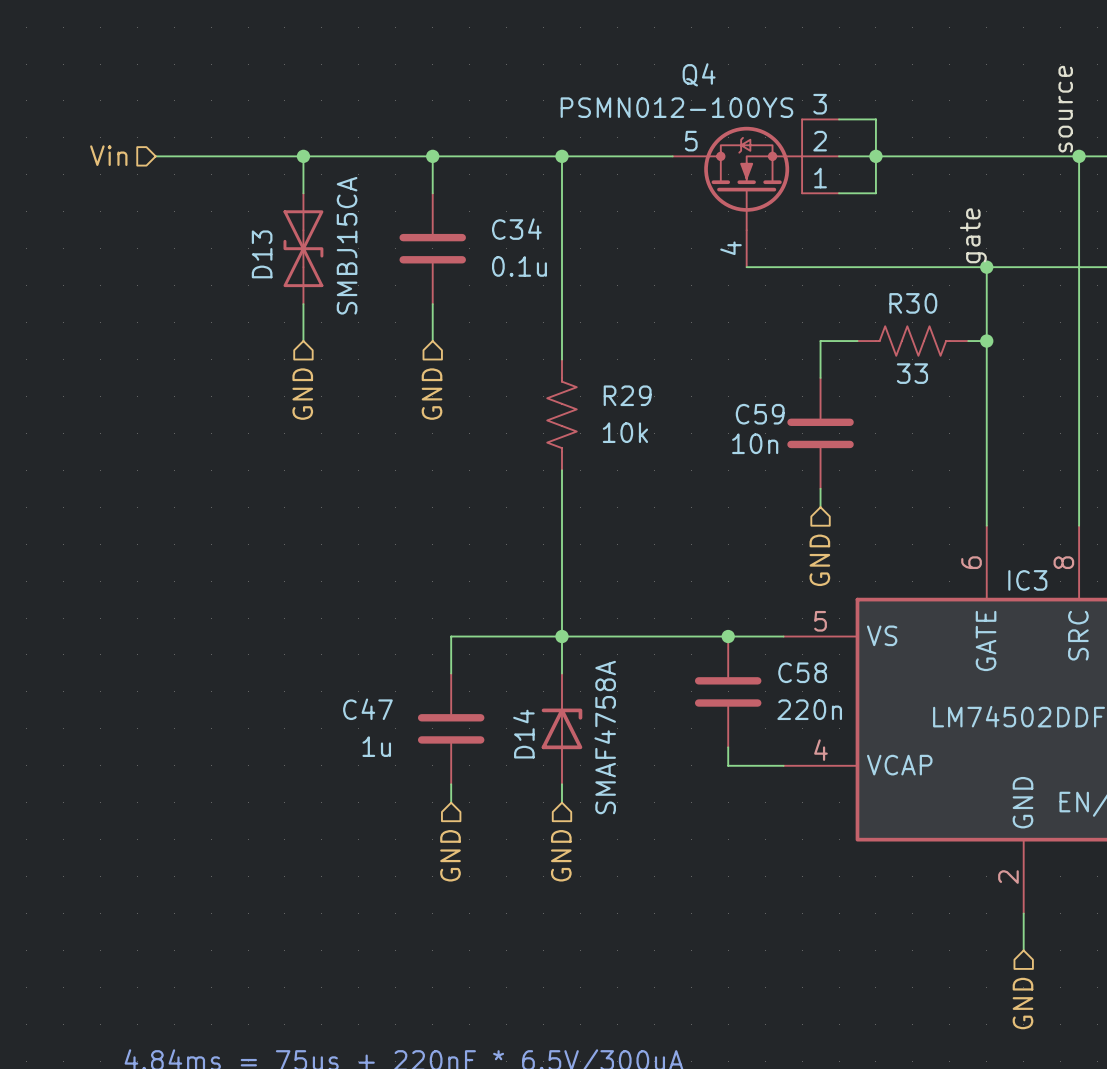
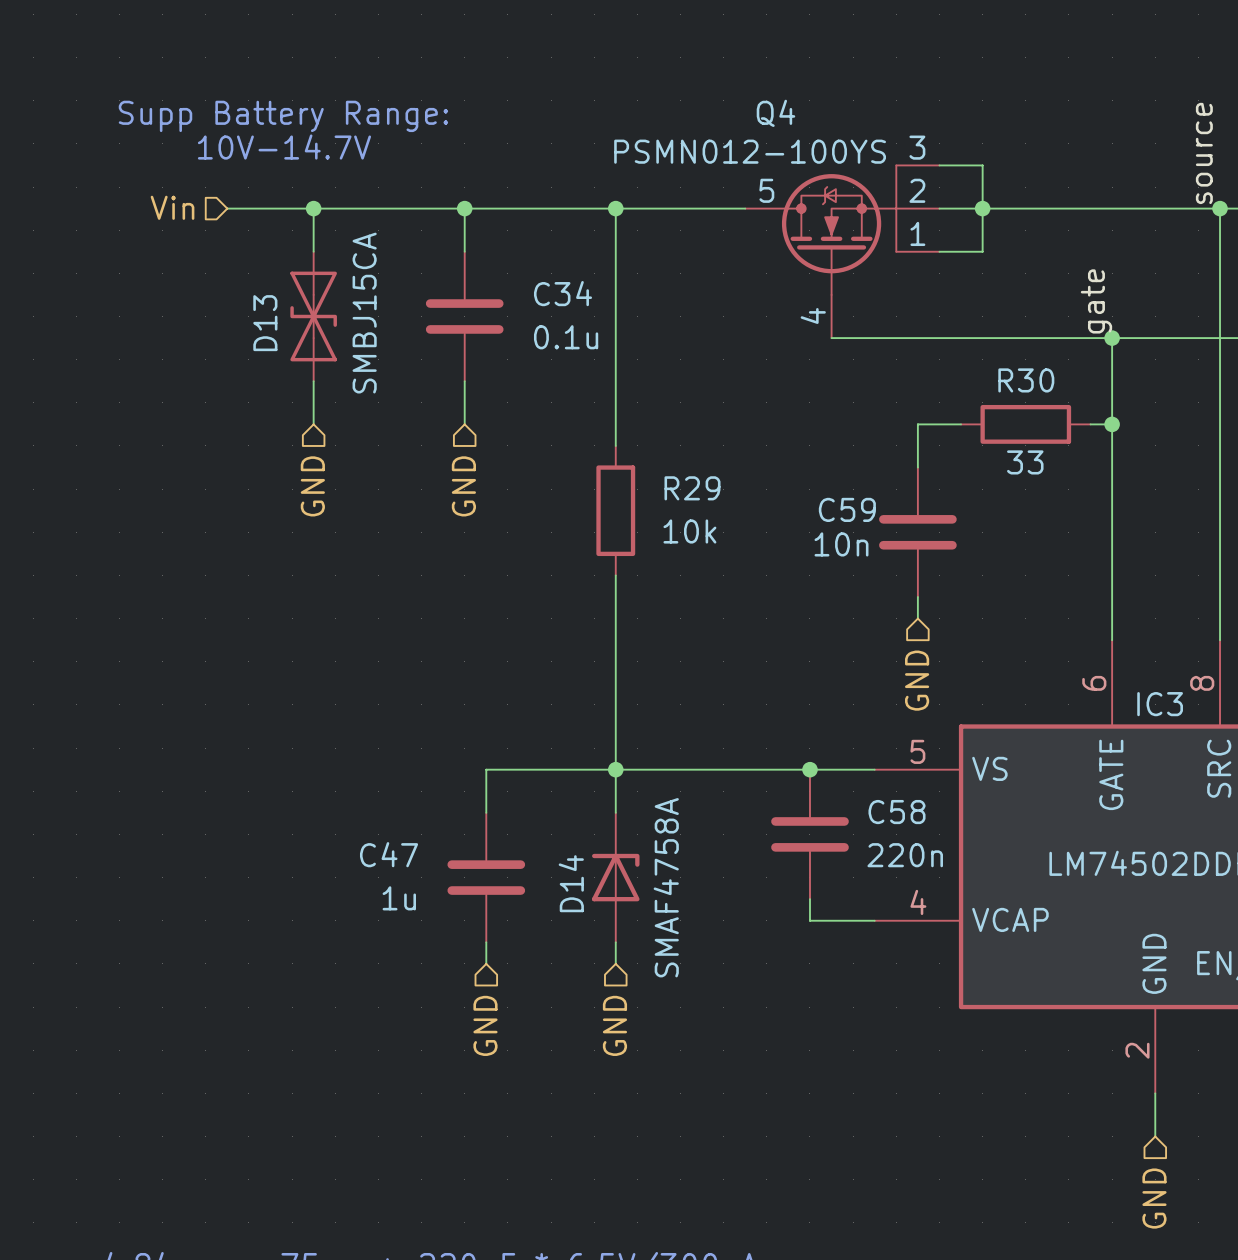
text: none -> Supp Battery Range: (283, 116)
text: none -> 10V-14.7V (284, 147)
hierarchical label position: Vin (108, 155) -> Vin (172, 207)
wire: (155, 156) (229, 156) -> none
R30 symbol: [857, 326, 969, 356] -> [961, 404, 1091, 444]
R29 symbol: [547, 359, 577, 471] -> [596, 445, 636, 576]

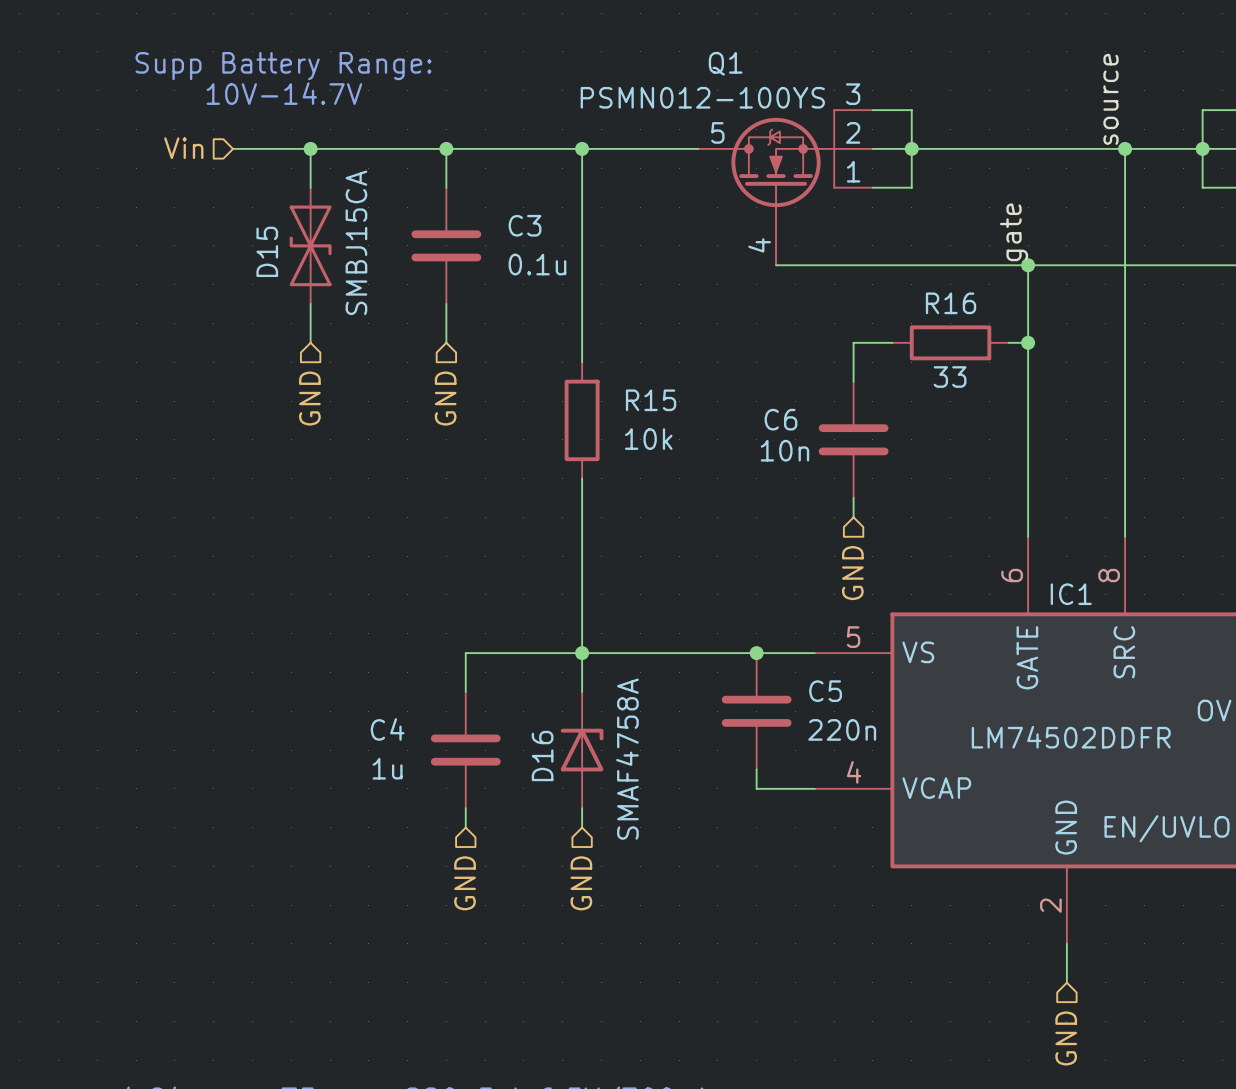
Q4 name: Q4 (775, 113) -> Q1 (725, 63)
C34 name: C34 (563, 293) -> C3 (525, 225)
D13 name: D13 (265, 323) -> D15 (267, 251)
R30 name: R30 (1026, 380) -> R16 (951, 303)
R29 name: R29 (692, 488) -> R15 (651, 400)
C59 name: C59 (847, 509) -> C6 (780, 419)
IC3 name: IC3 (1160, 704) -> IC1 (1071, 594)
C58 name: C58 (896, 812) -> C5 (825, 691)
C47 name: C47 (389, 854) -> C4 (387, 729)
D14 name: D14 (571, 883) -> D16 (542, 756)

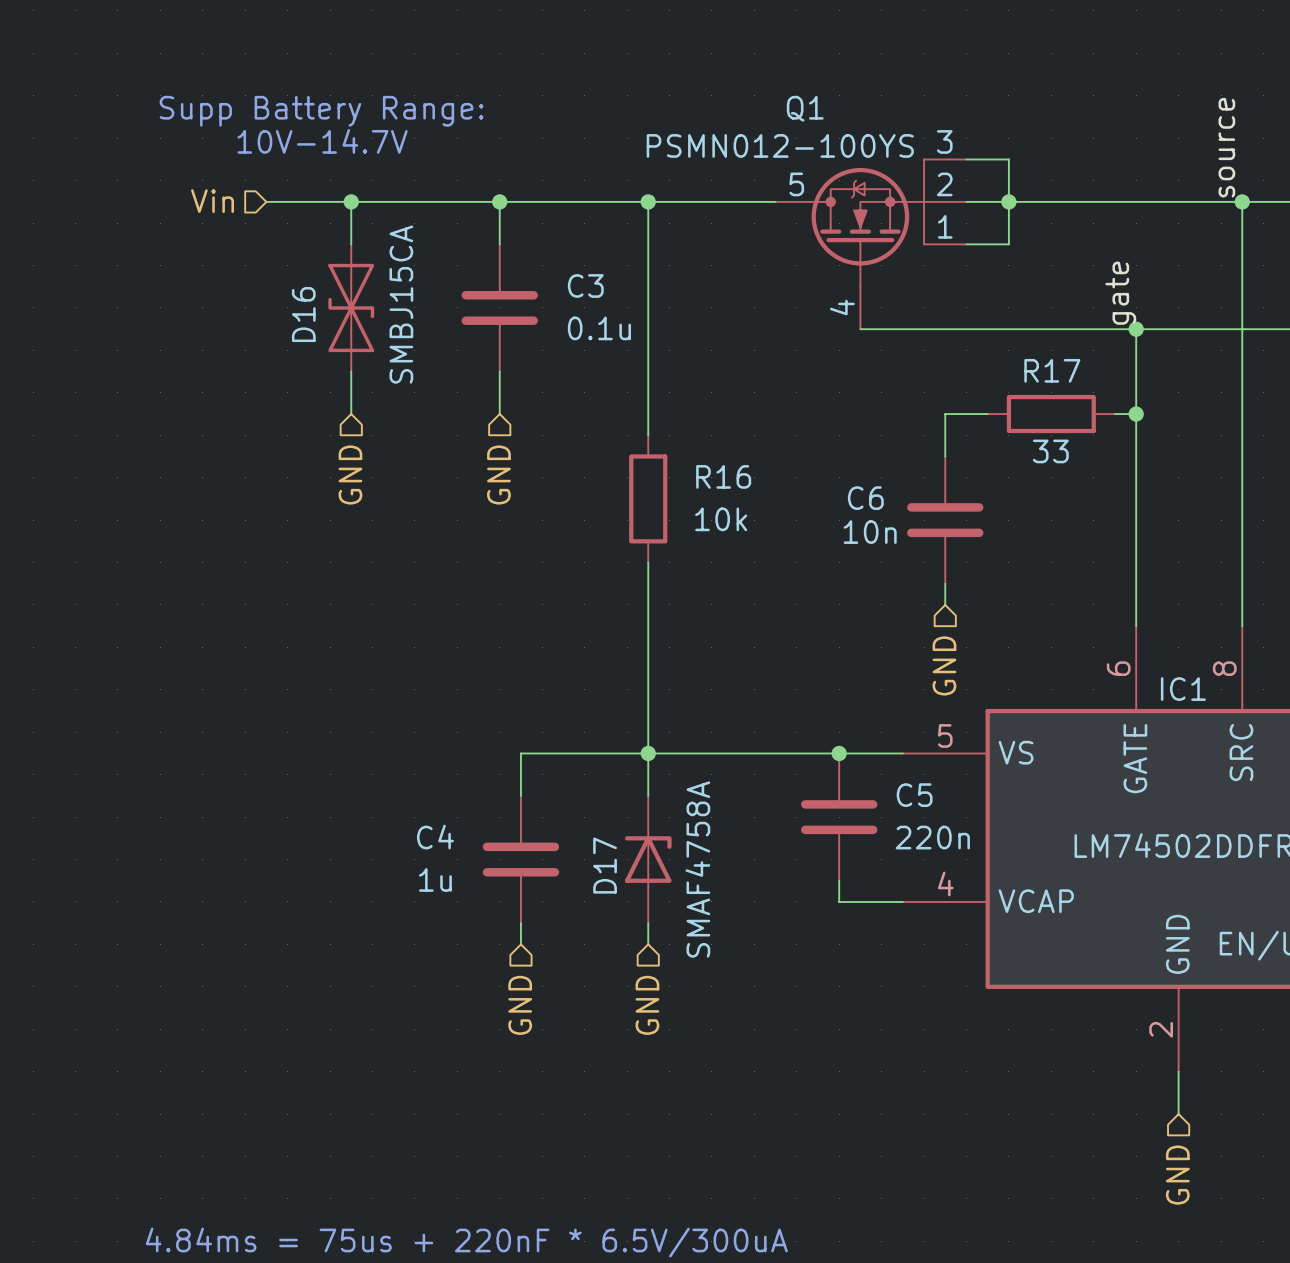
D15 name: D15 (267, 251) -> D16 (303, 314)
R16 name: R16 (951, 303) -> R17 (1052, 370)
R15 name: R15 (651, 400) -> R16 (723, 476)
D16 name: D16 (542, 756) -> D17 (605, 865)

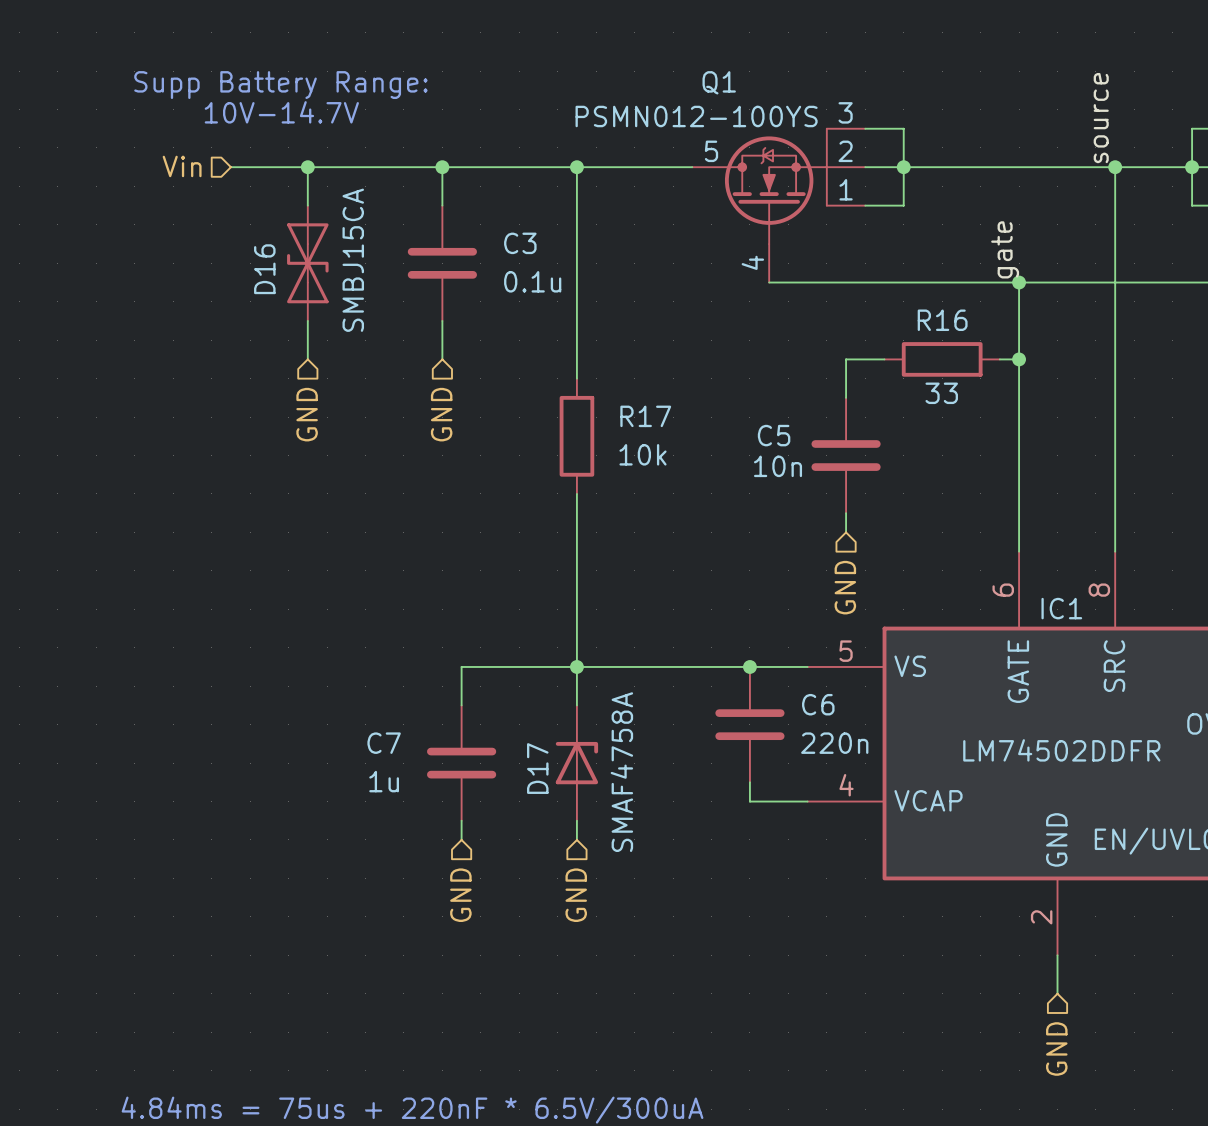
R17 name: R17 (1052, 370) -> R16 (942, 320)
R16 name: R16 (723, 476) -> R17 (645, 416)
C6 name: C6 (865, 498) -> C5 (774, 435)
C5 name: C5 (914, 795) -> C6 (818, 704)
C4 name: C4 (435, 837) -> C7 (384, 743)

